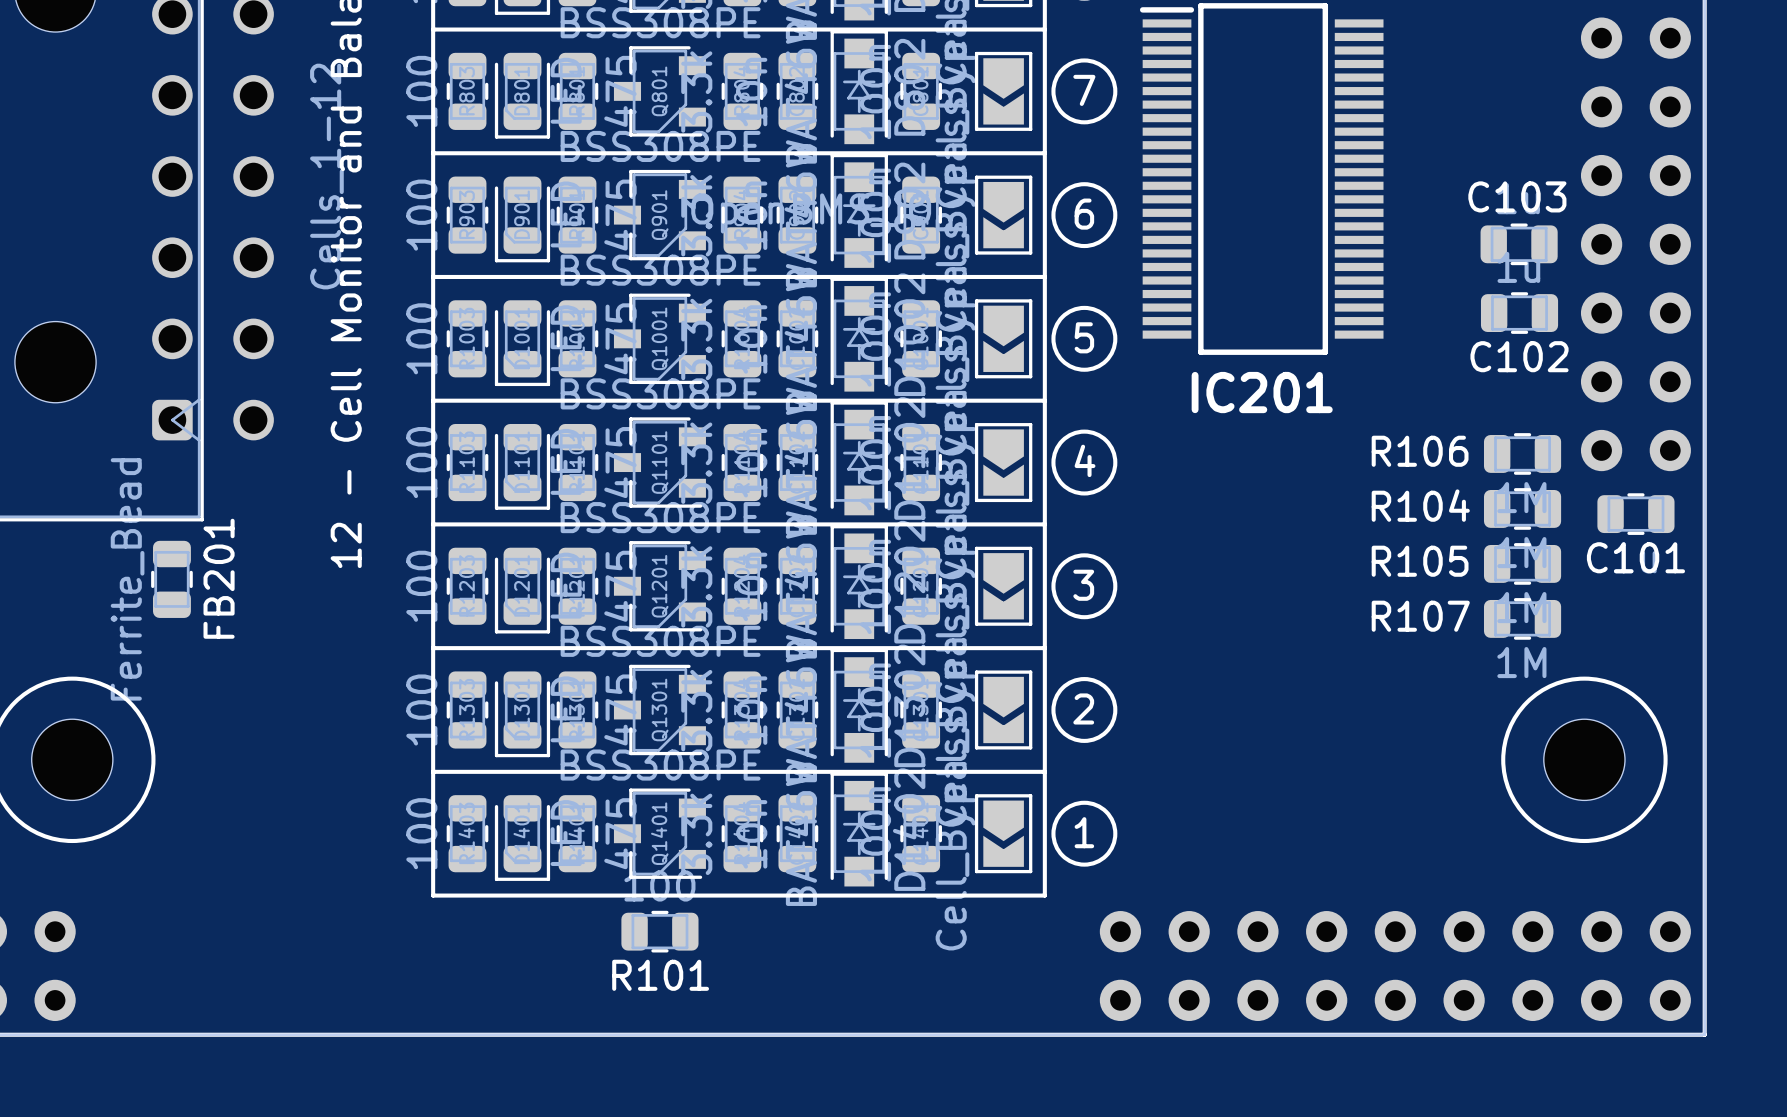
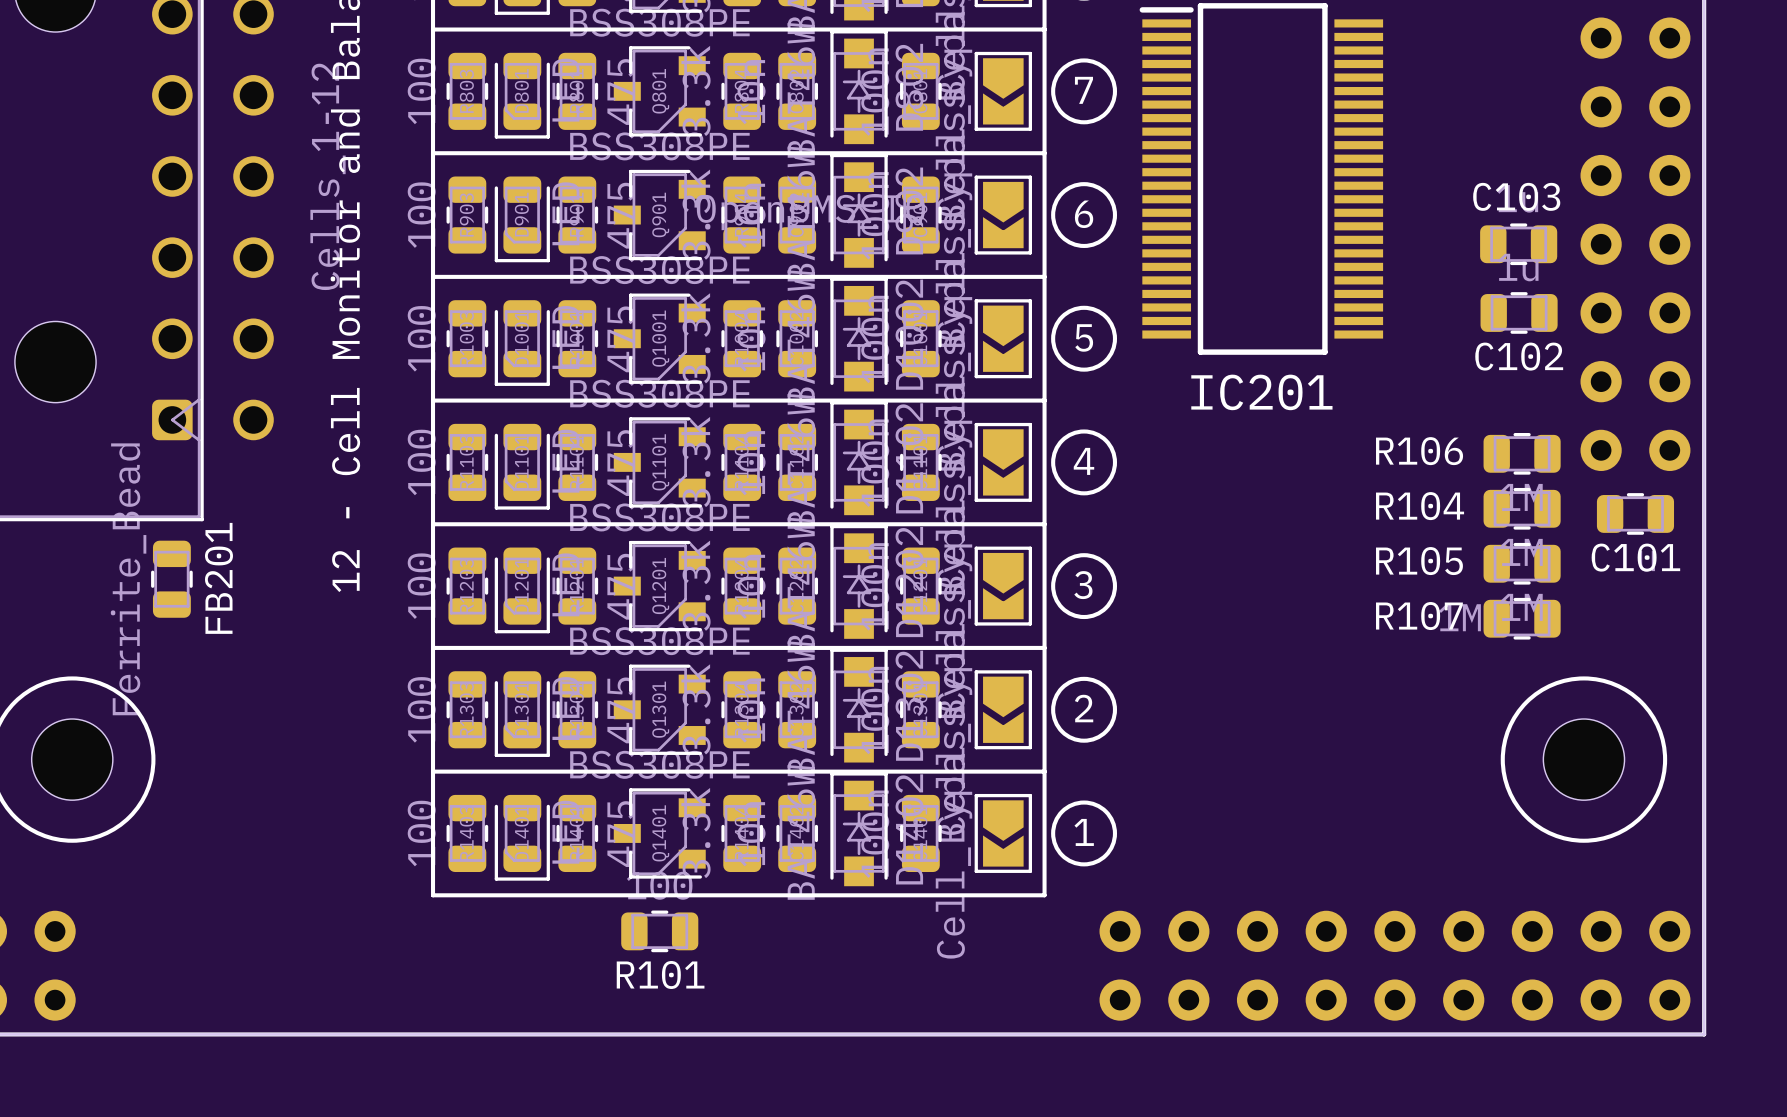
R107 value position: 1M (1521, 662) -> 1M (1459, 617)

